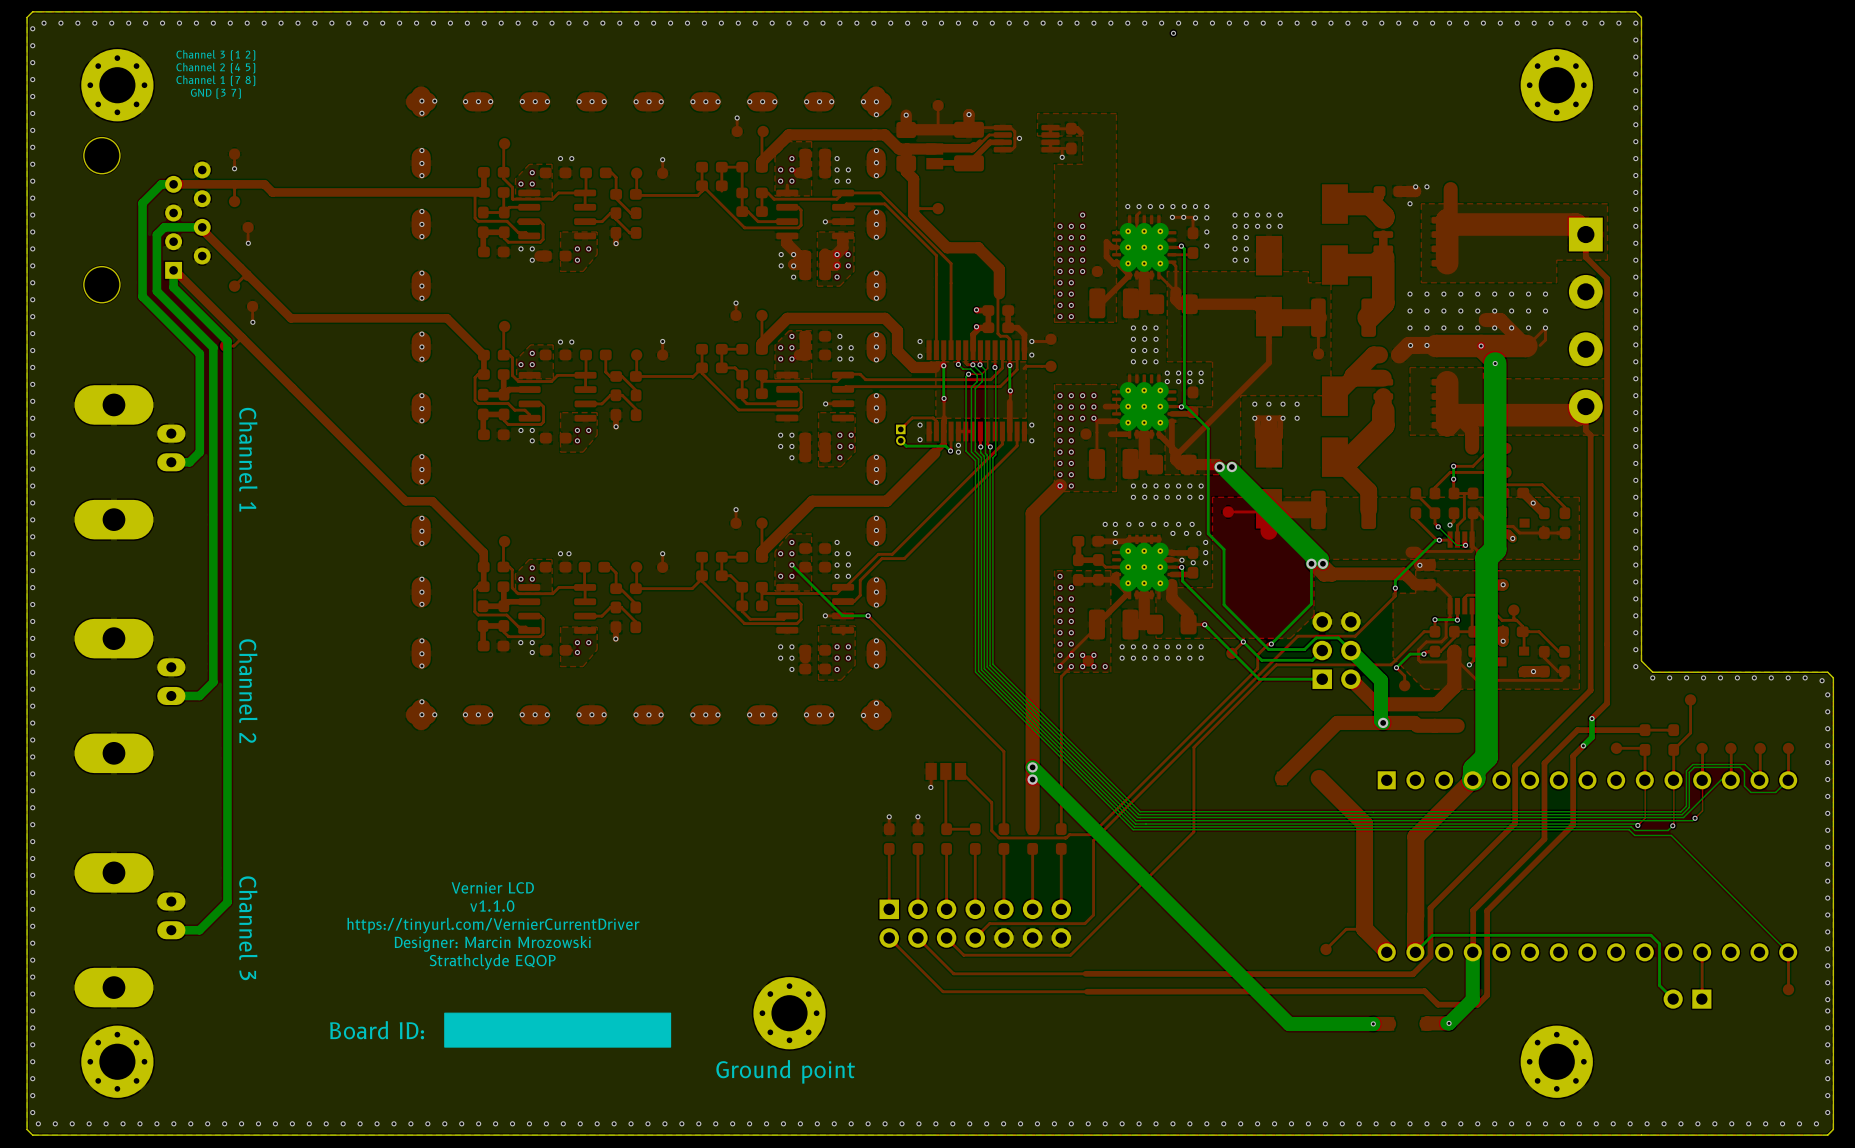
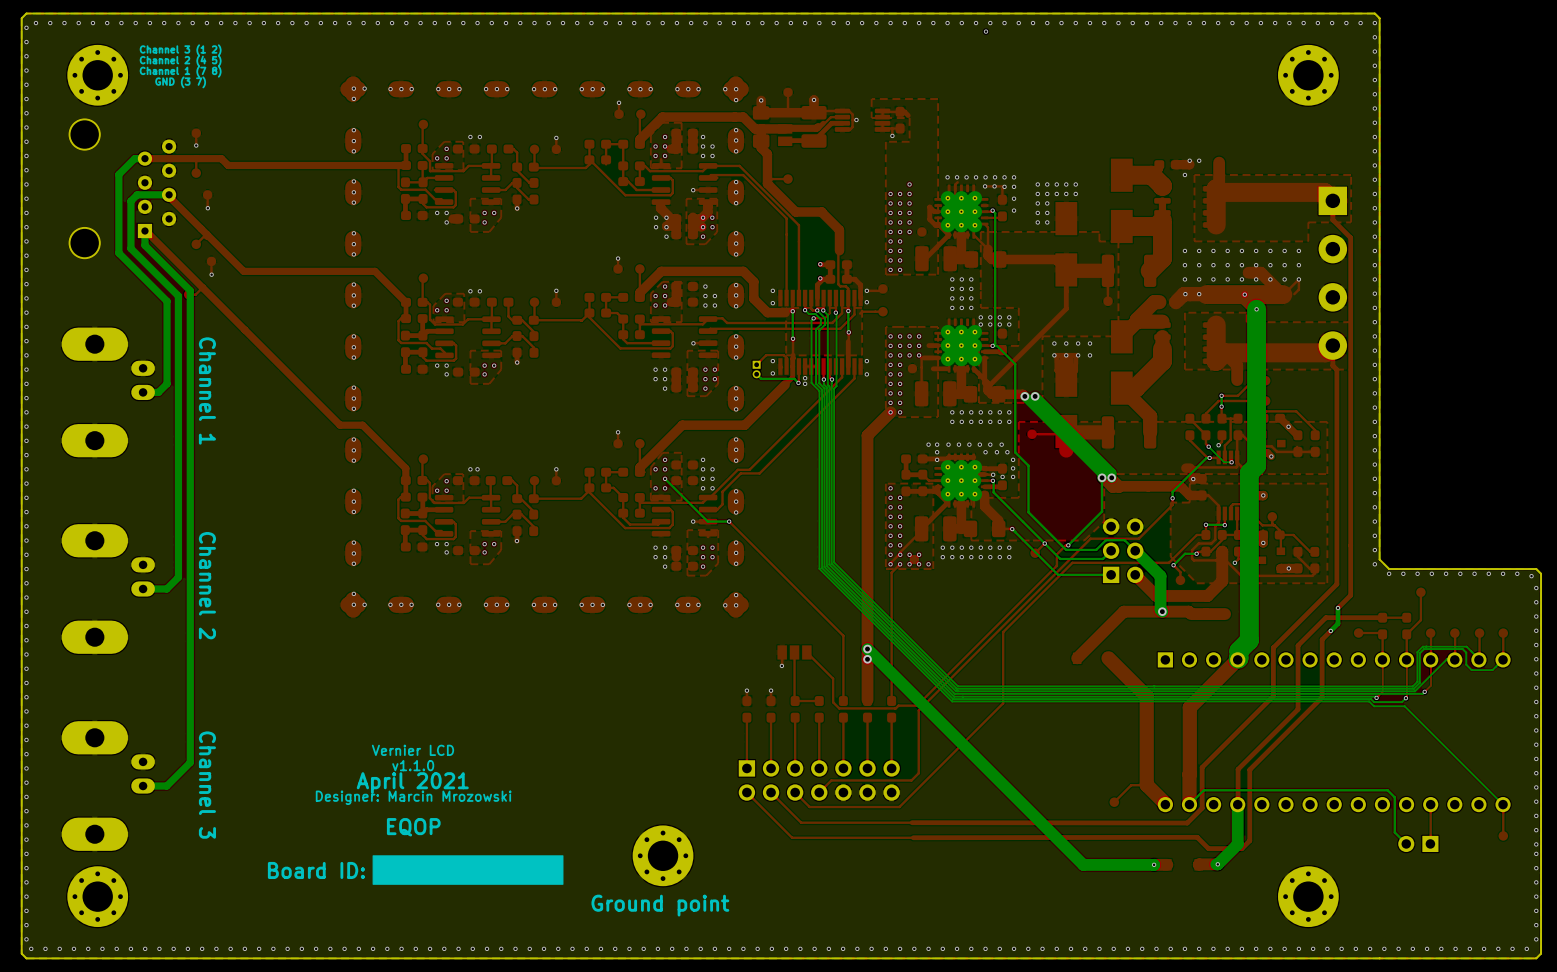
text: https://tinyurl.com/VernierCurrentDriver (493, 925) -> April 2021 (412, 783)
text: Strathclyde EQOP (492, 961) -> none
text: none -> EQOP (413, 827)

